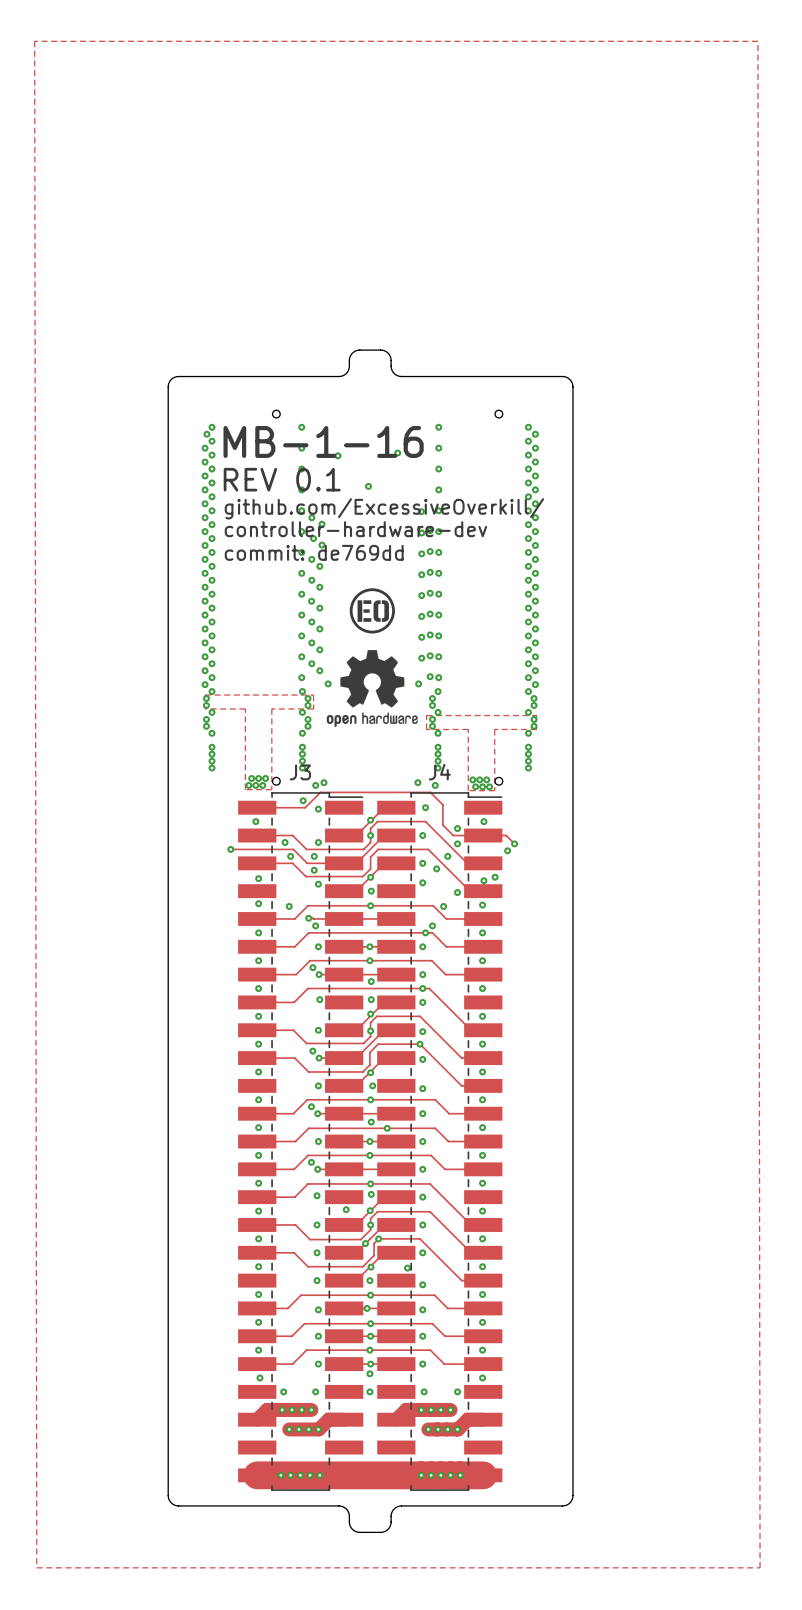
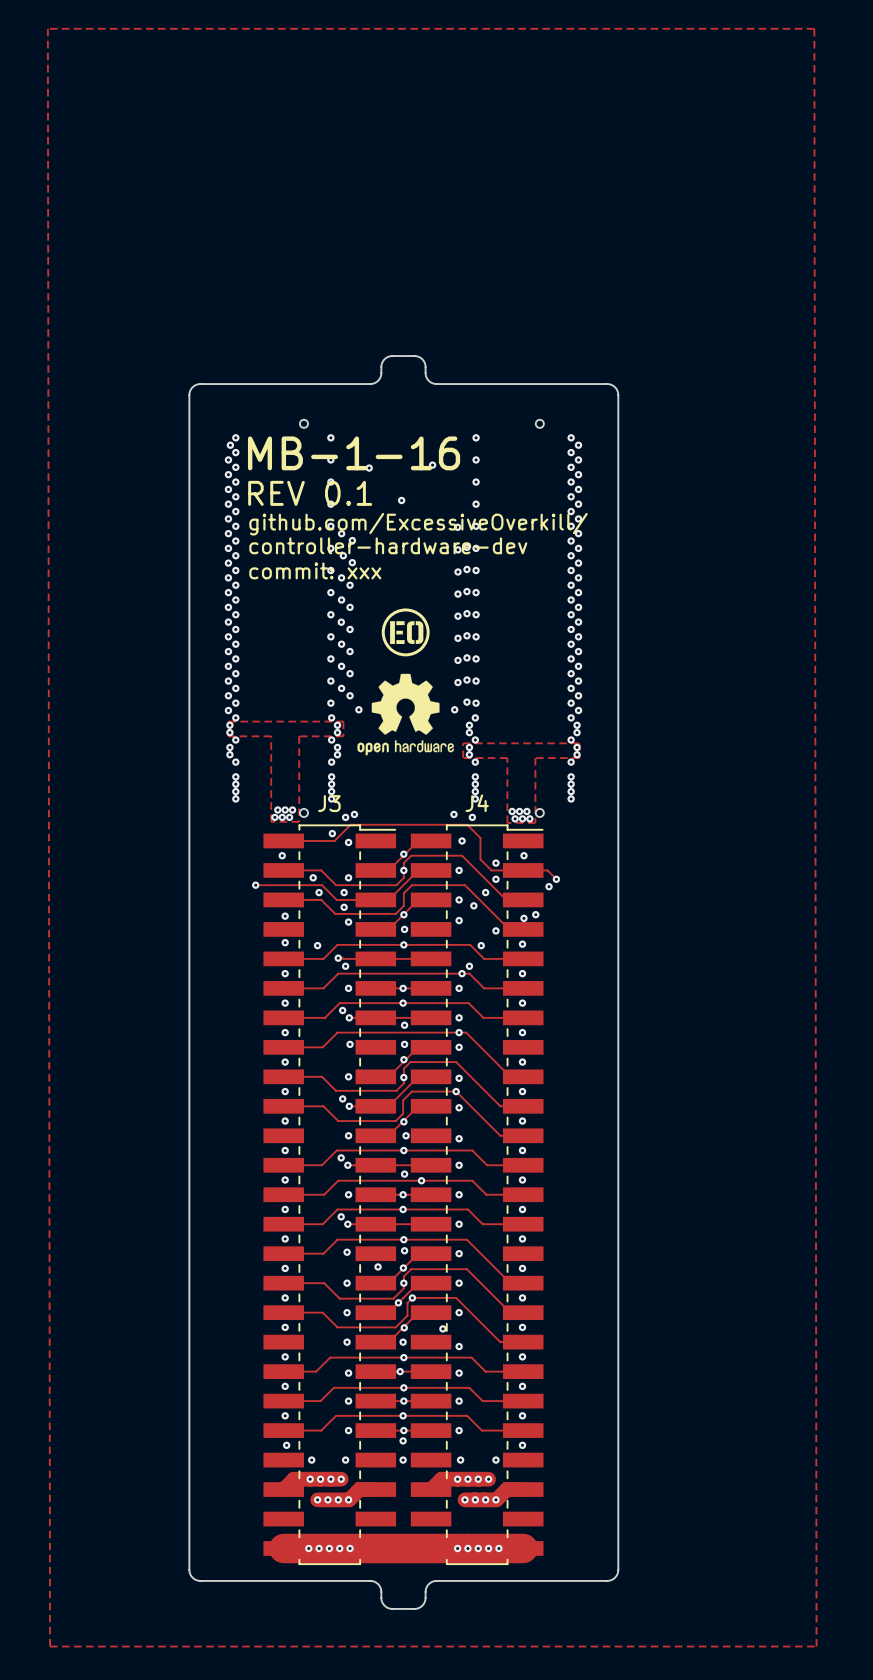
text: commit: de769dd (314, 552) -> commit: xxx (315, 570)

